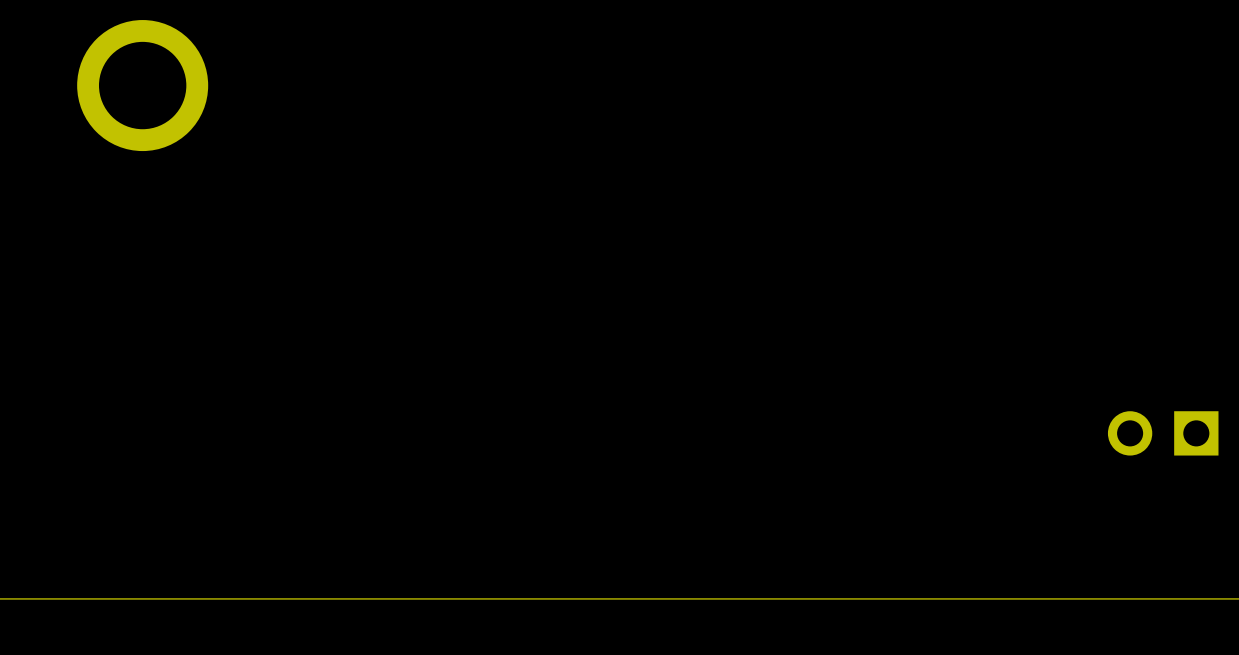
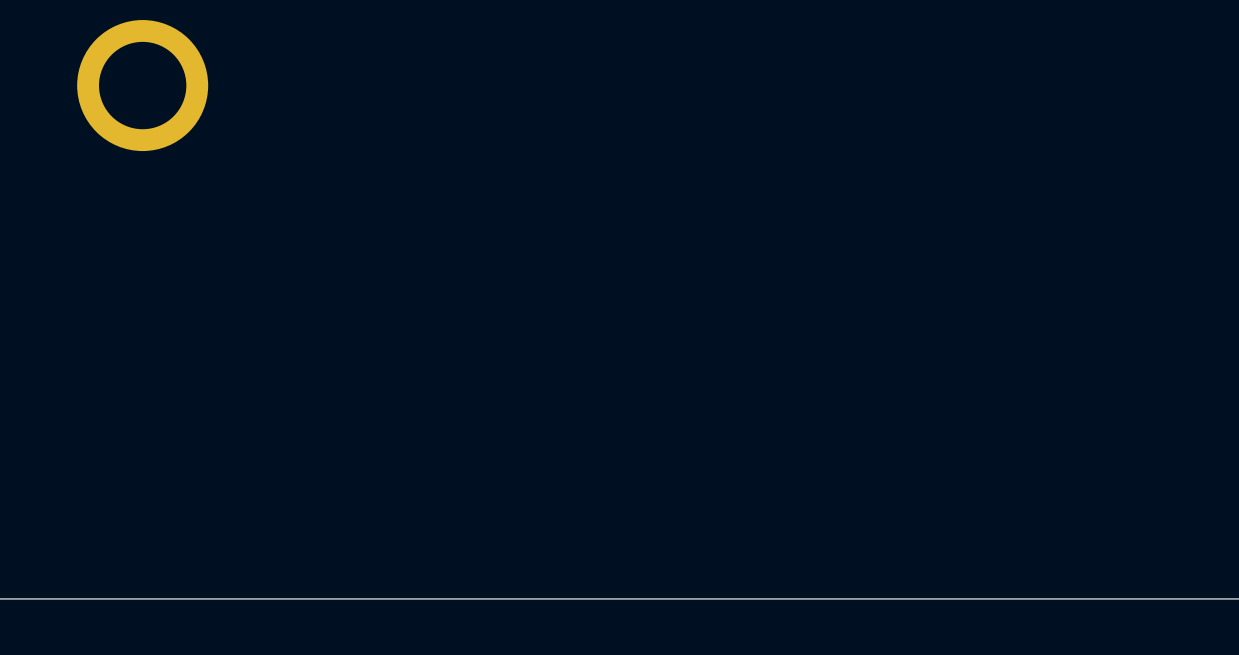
part: (1163, 433) -> none

